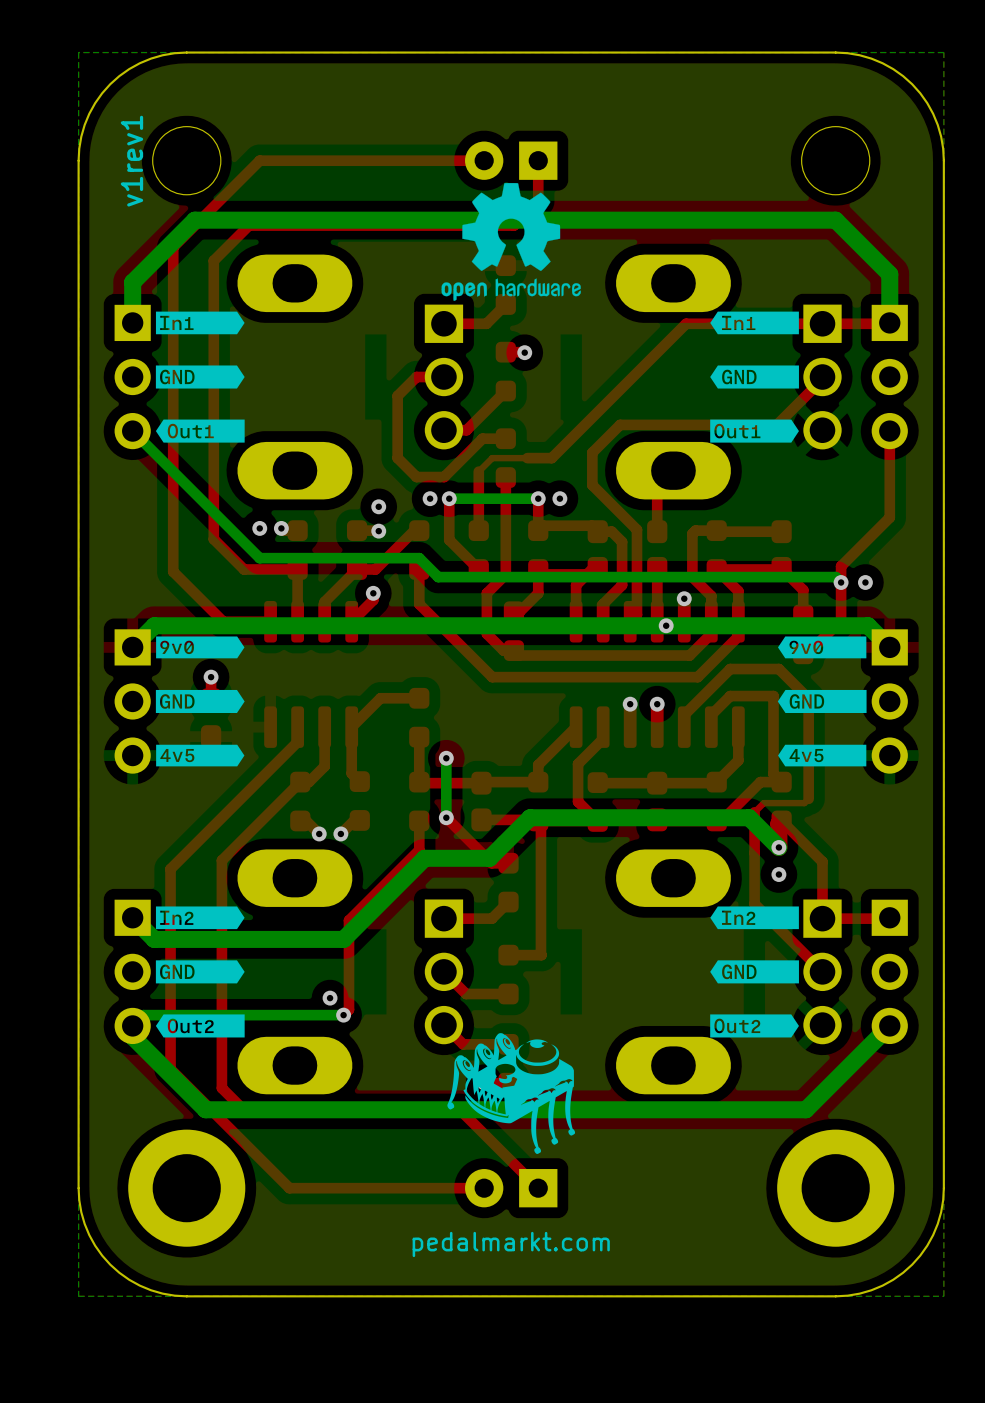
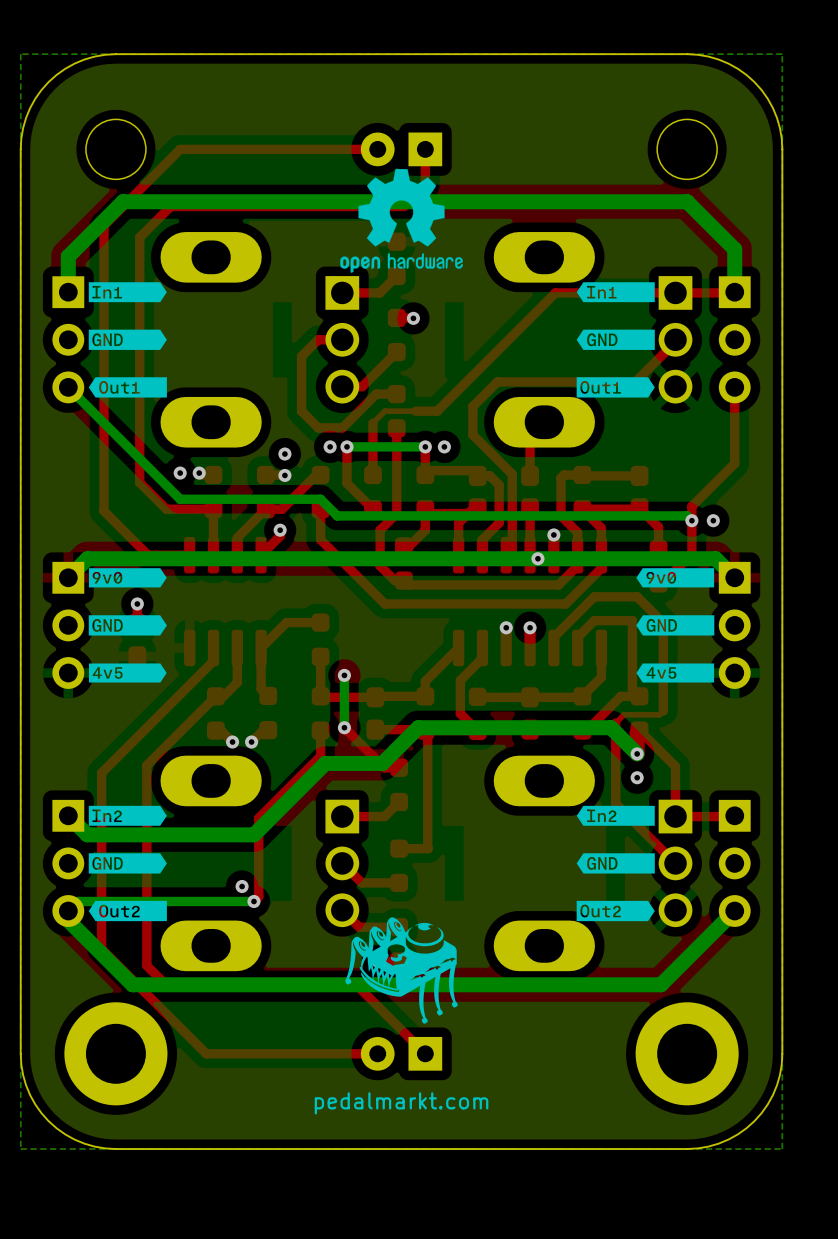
text: v1rev1 (131, 161) -> none

